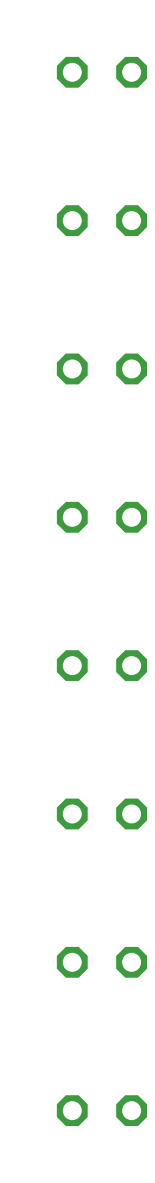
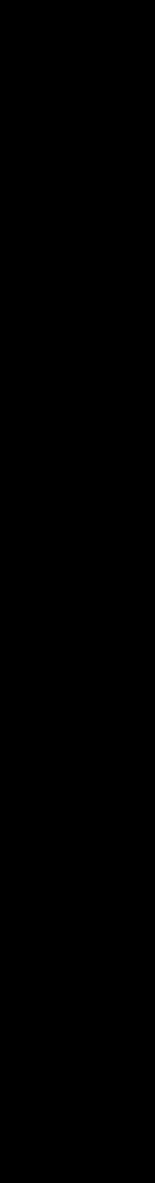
part: (101, 72) -> none
part: (101, 220) -> none
part: (101, 368) -> none
part: (101, 517) -> none
part: (101, 665) -> none
part: (101, 813) -> none
part: (101, 962) -> none
part: (101, 1110) -> none

